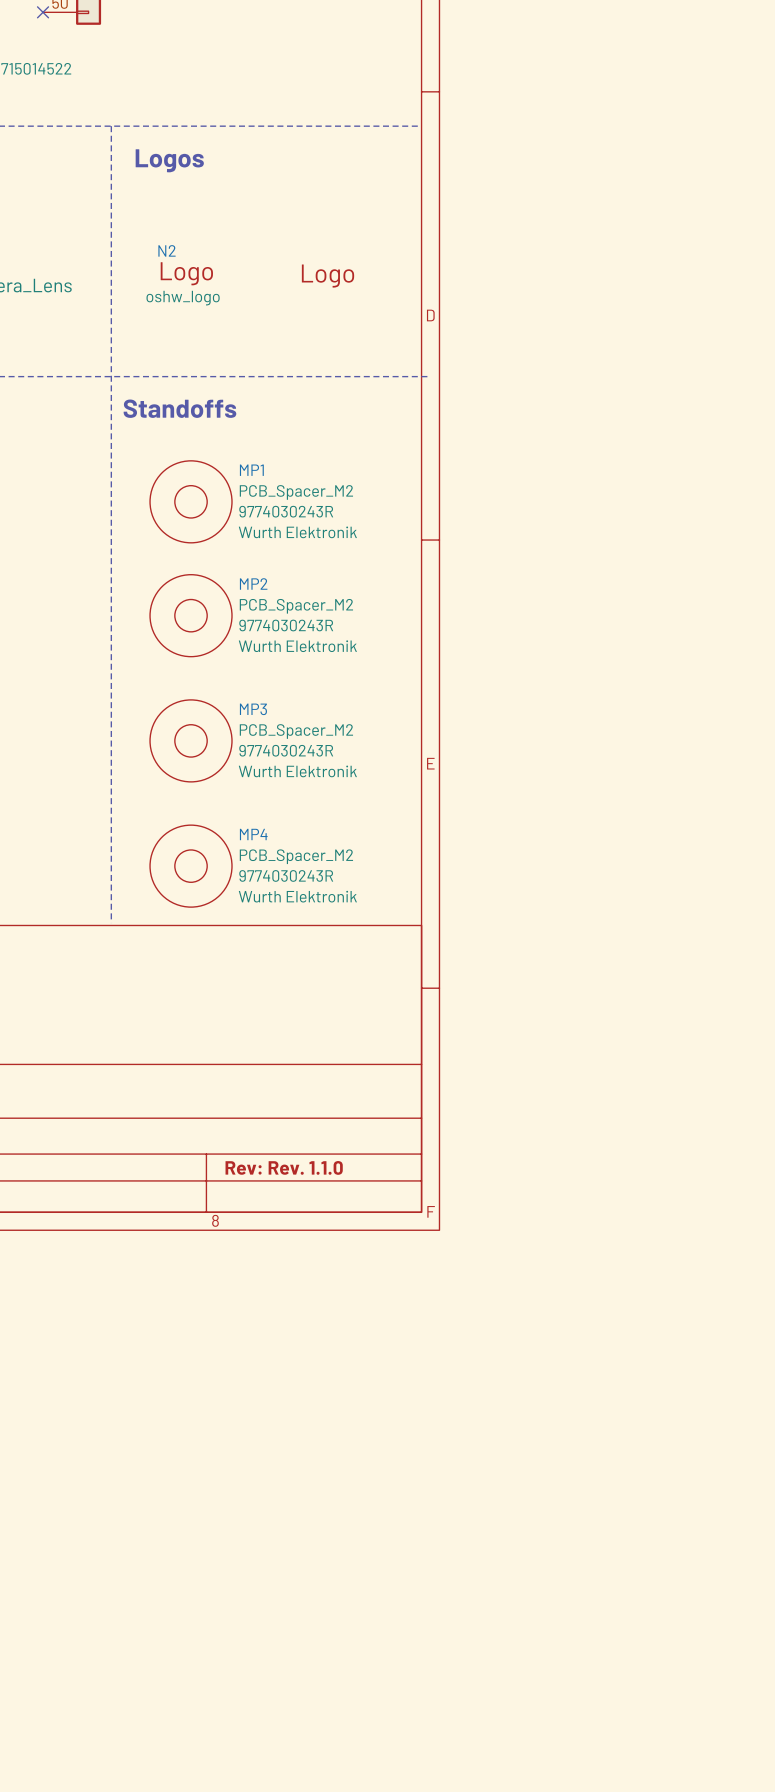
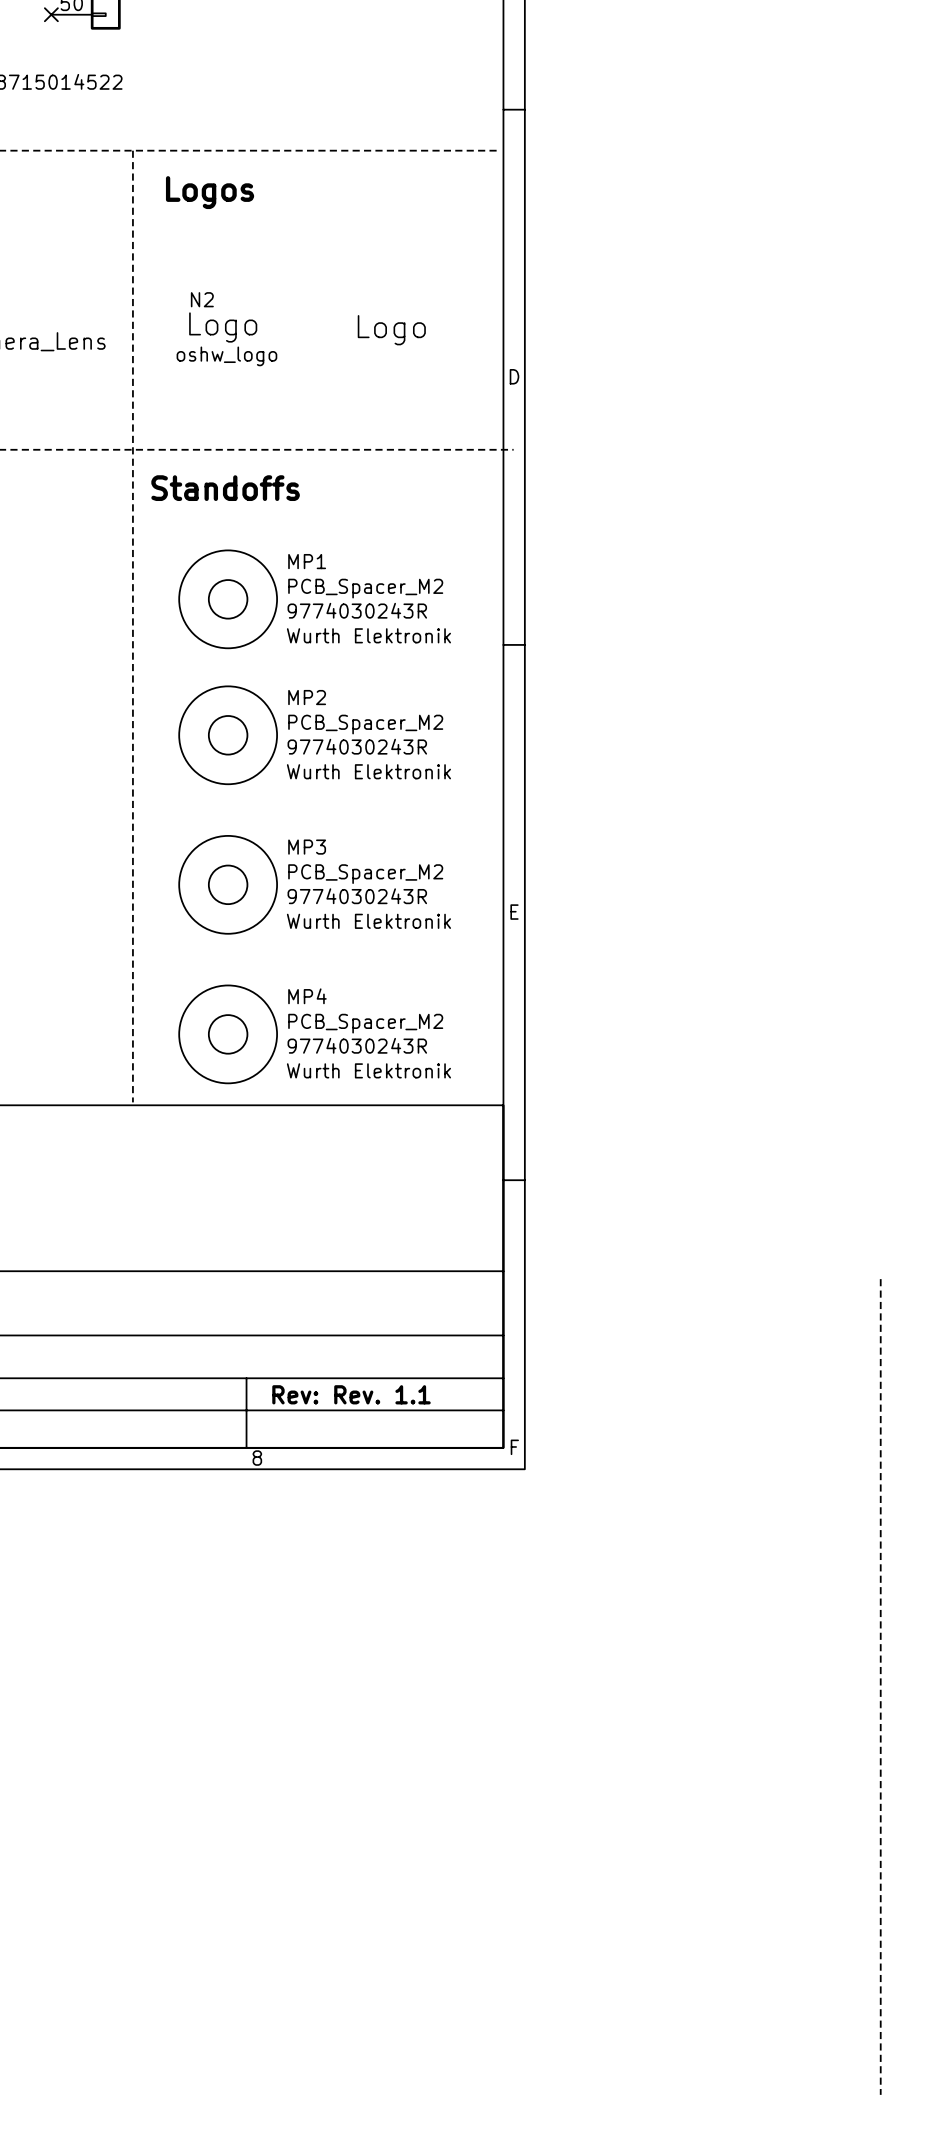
line: none -> (880, 1279) (880, 2094)
title block: Rev: Rev. 1.1.0 (284, 1167) -> Rev: Rev. 1.1 (351, 1394)

